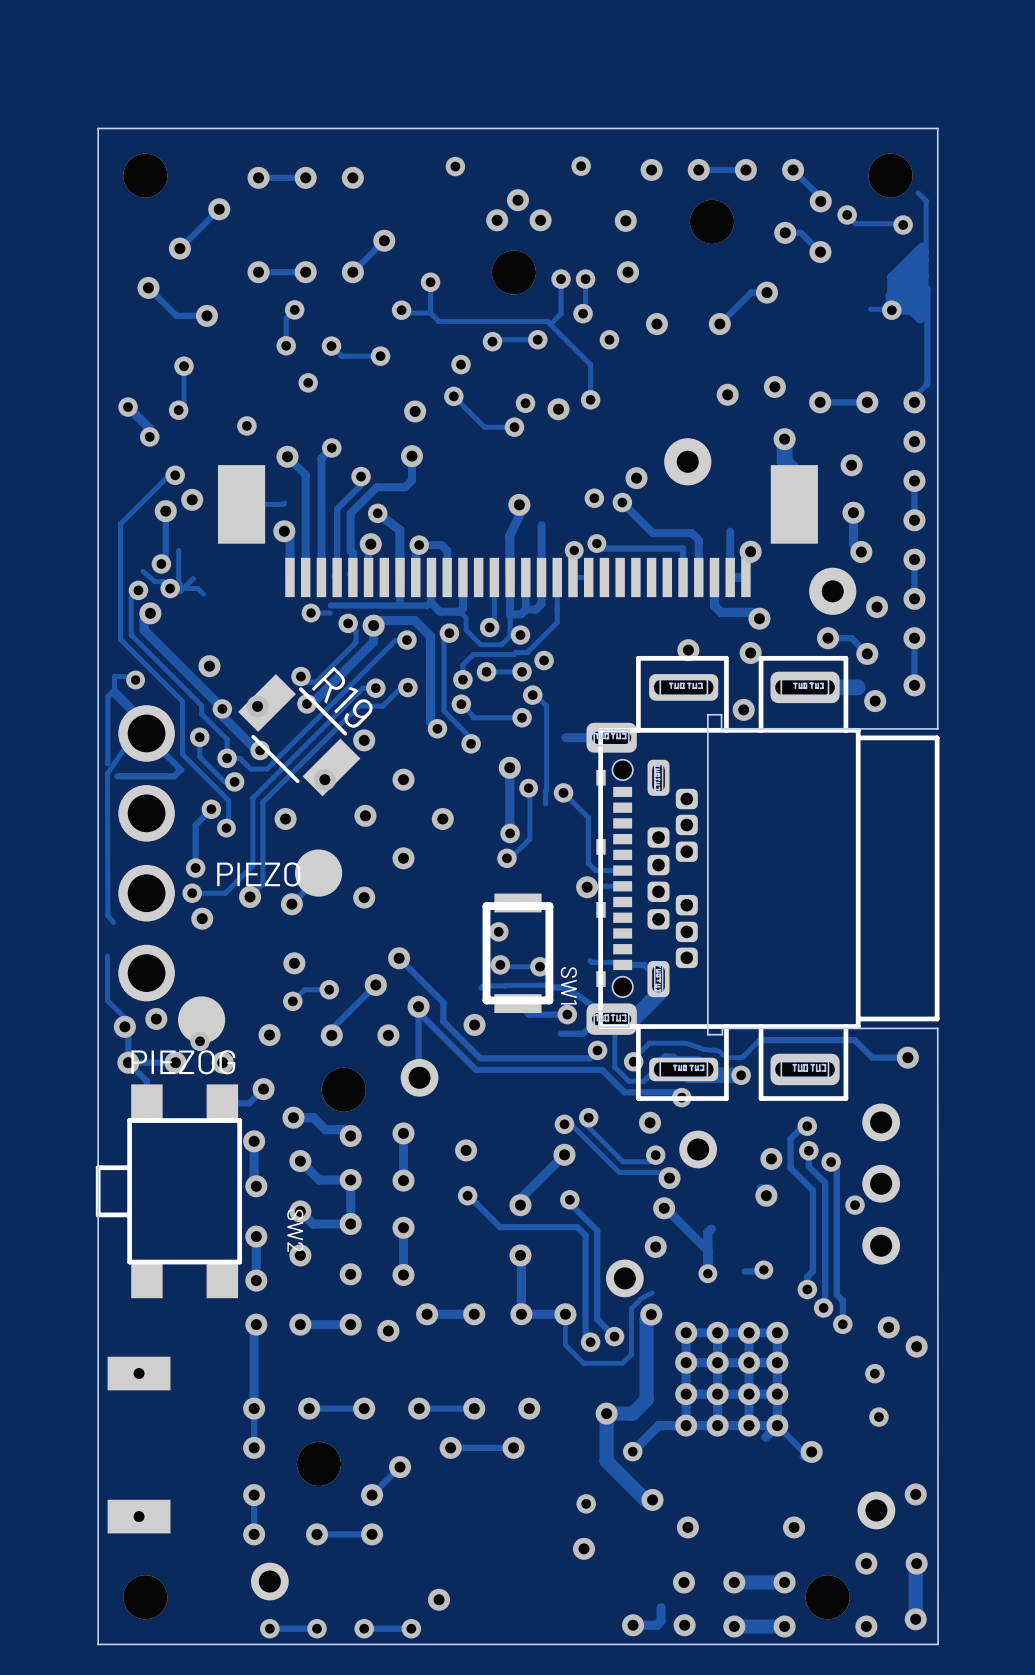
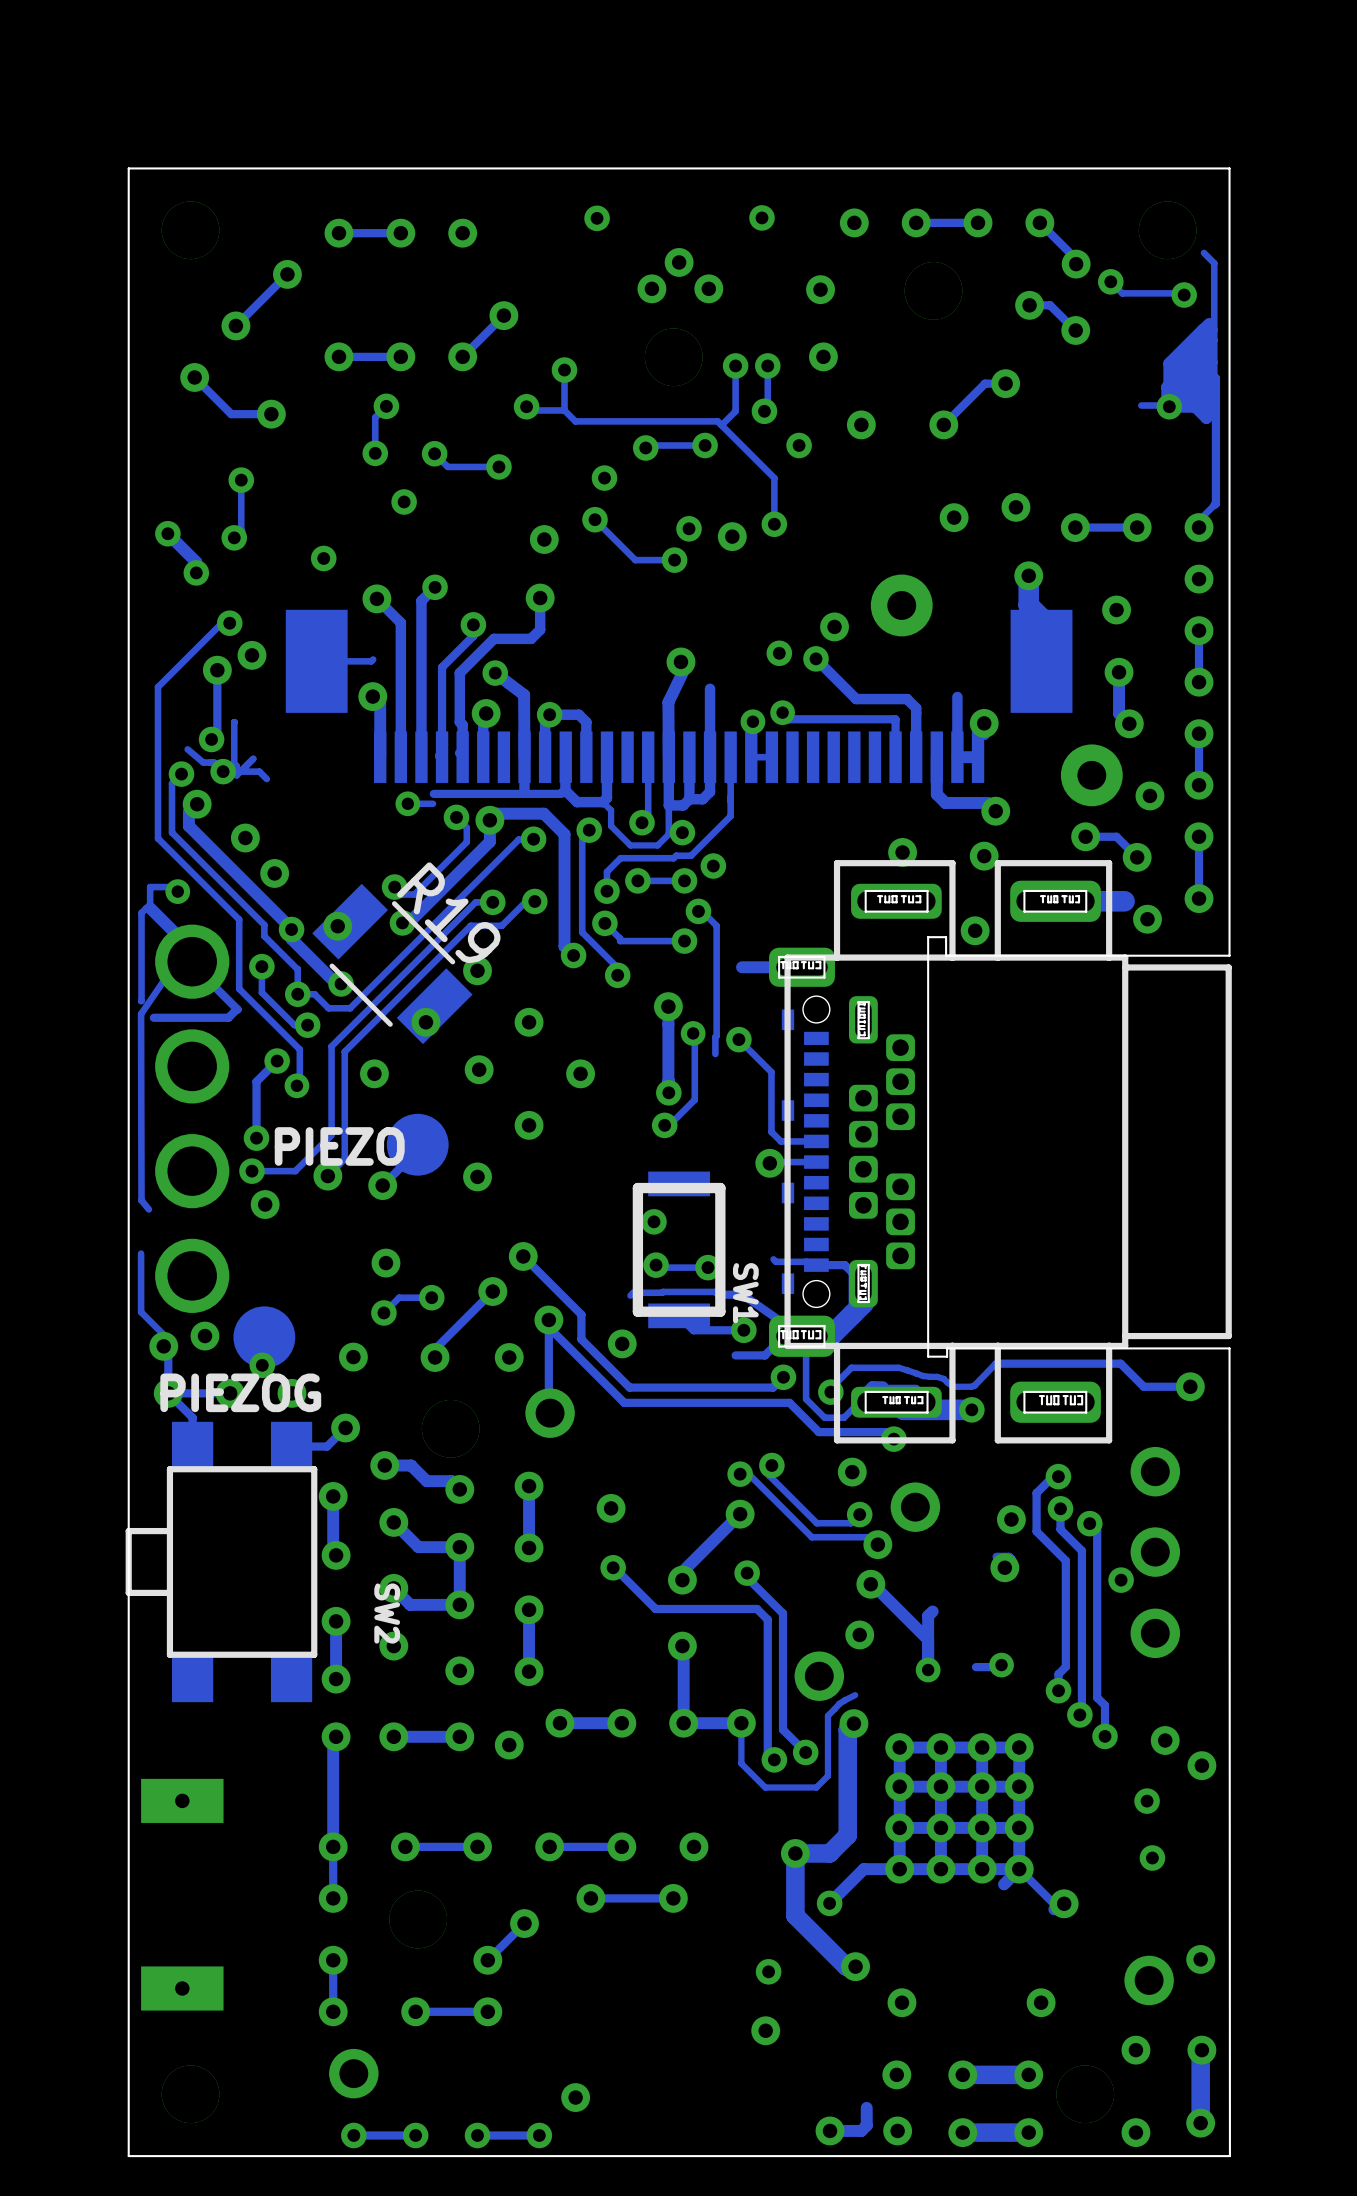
via: none -> (245, 838)

